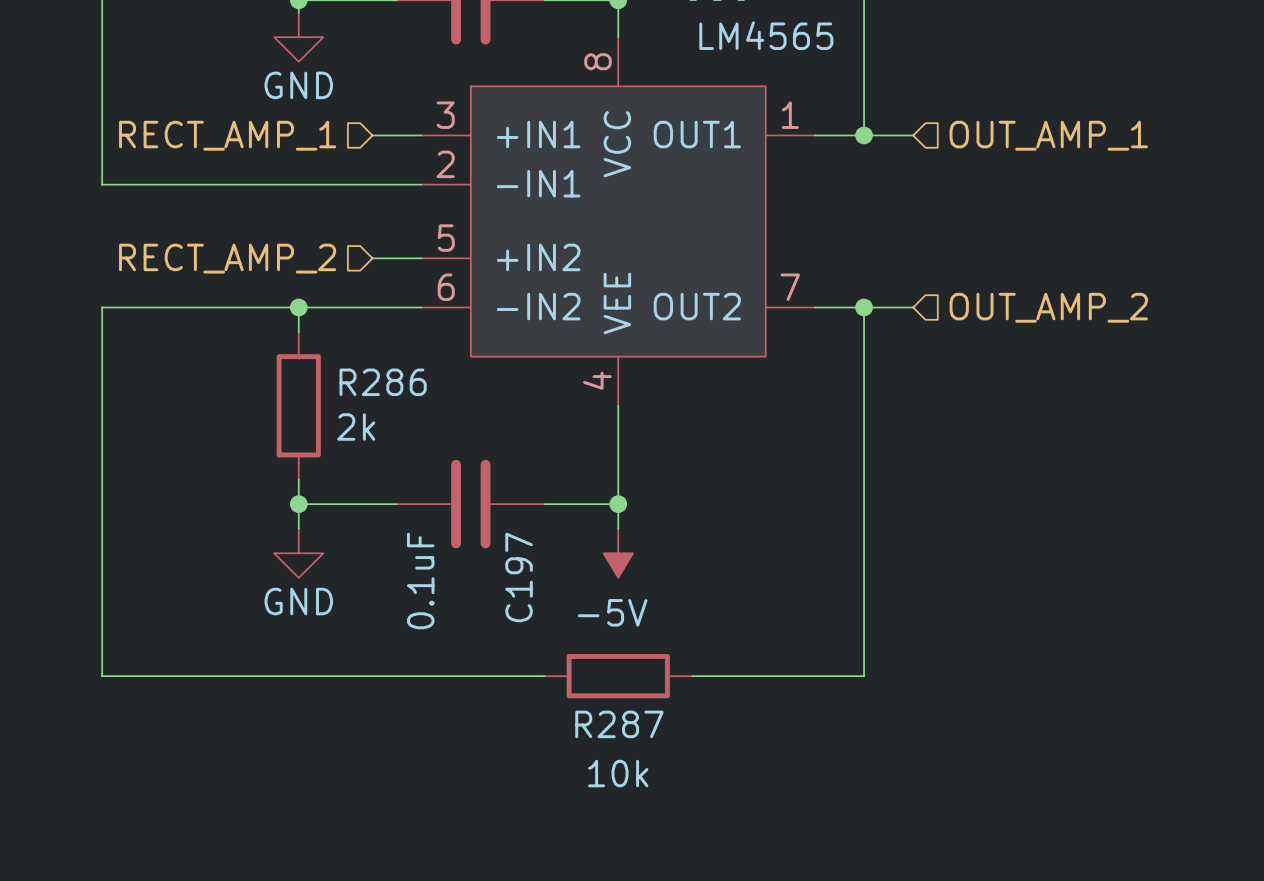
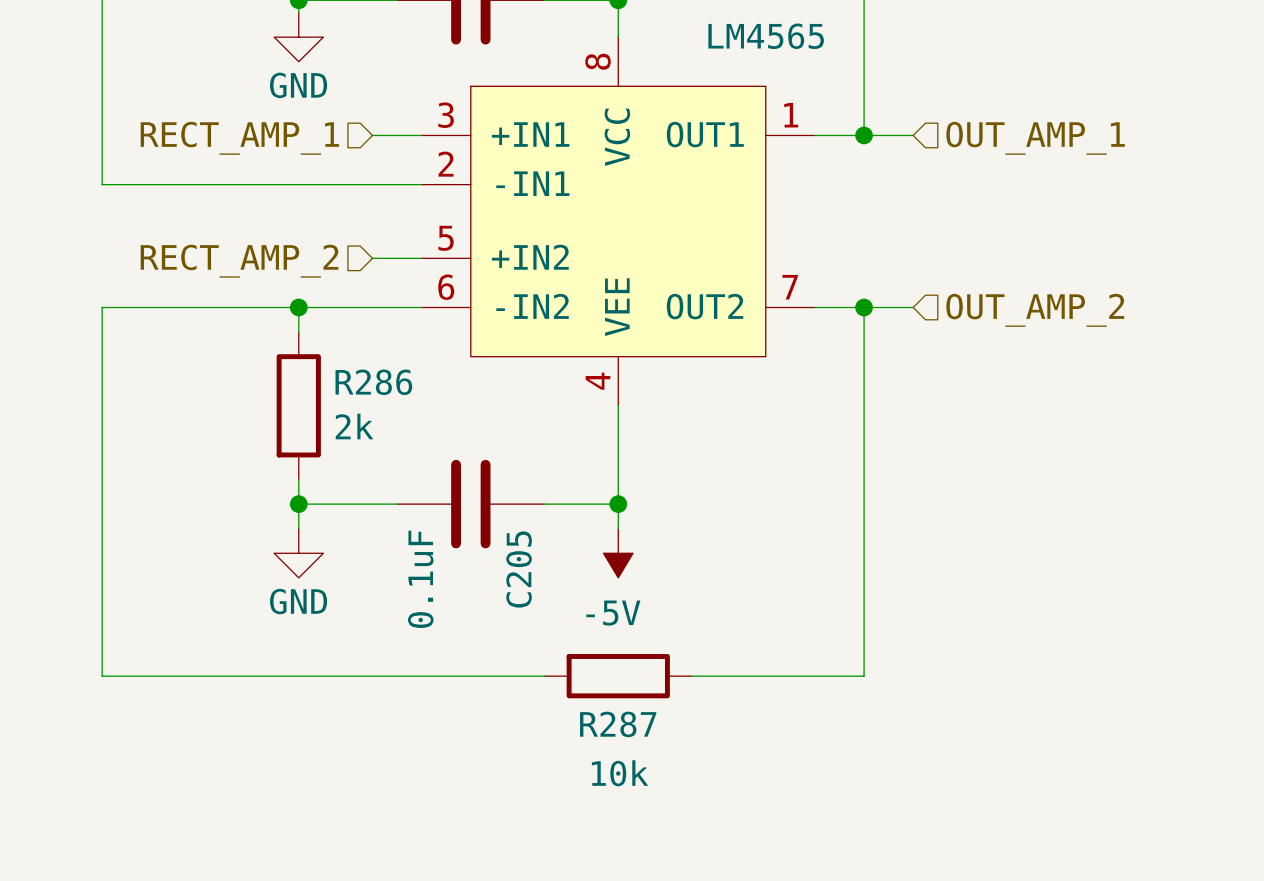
C197 name: C197 (519, 577) -> C205 (519, 569)

